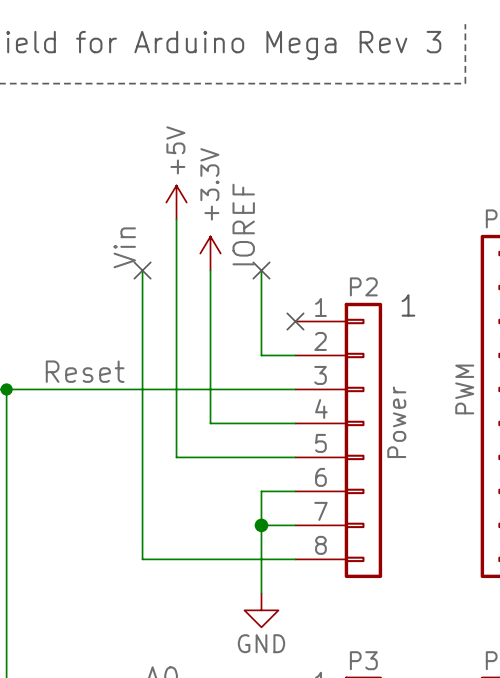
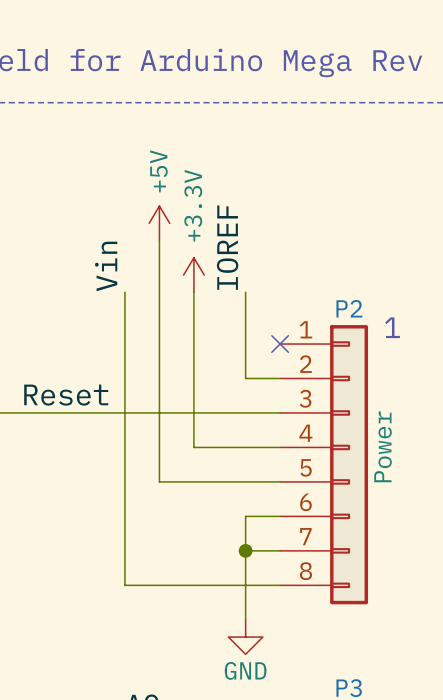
no-connect mark: (142, 270) -> none
no-connect mark: (261, 270) -> none

